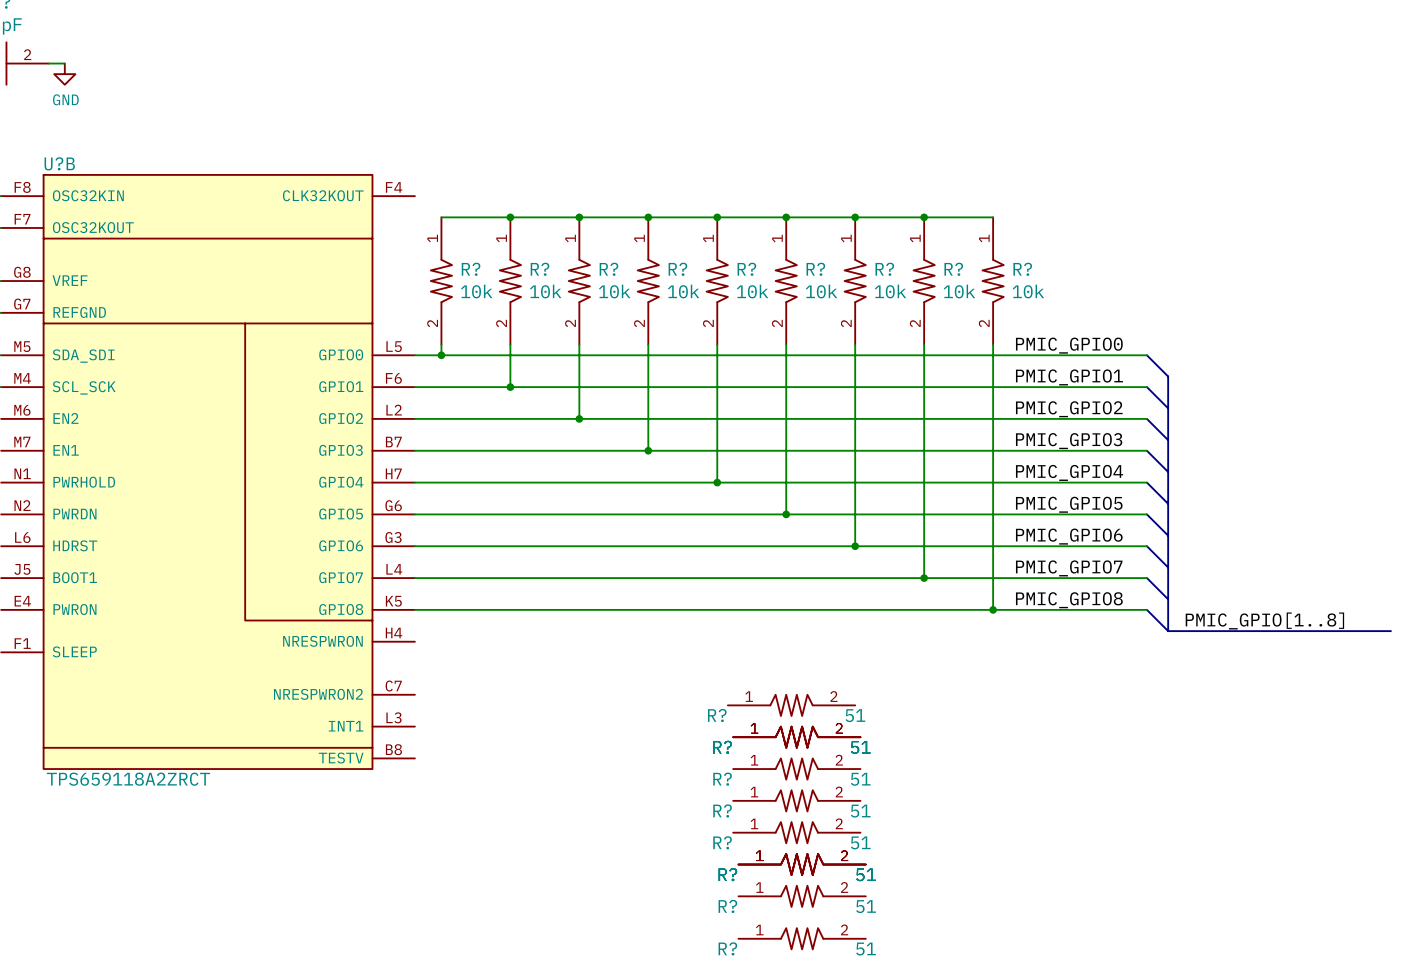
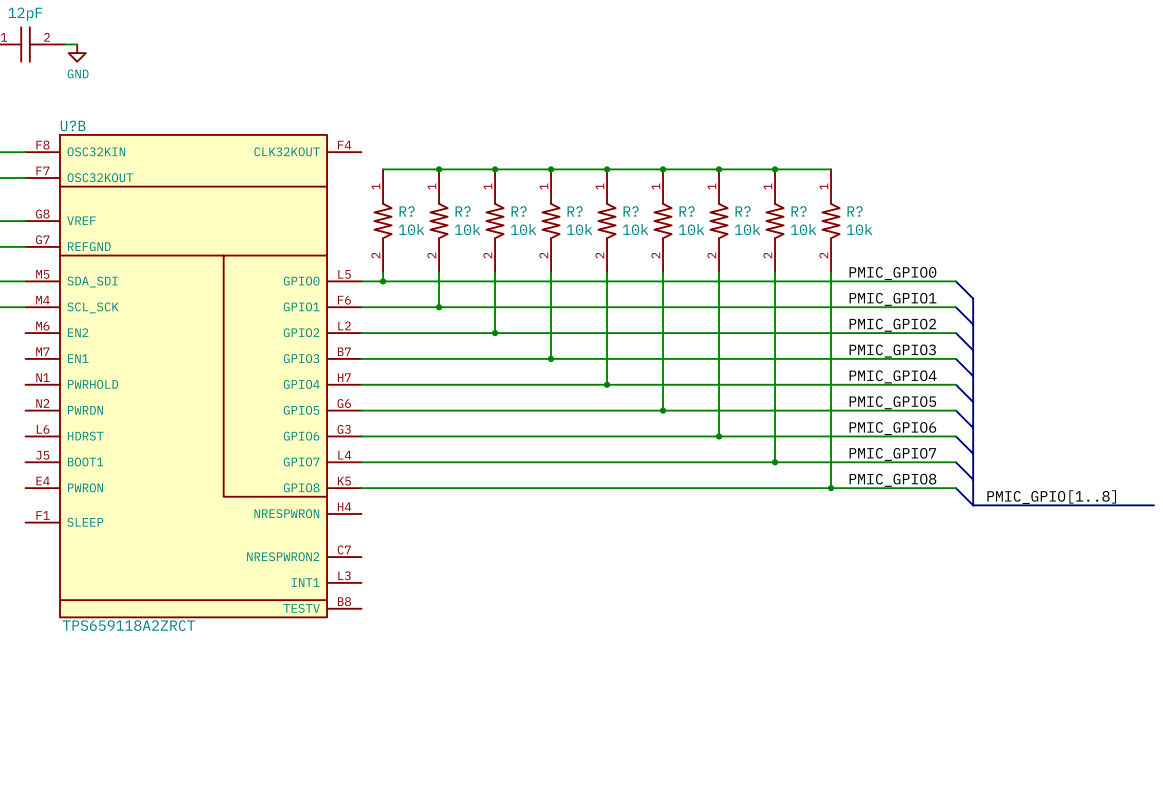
R?: (791, 705) -> none
R?: (796, 737) -> none
R?: (796, 769) -> none
R?: (796, 800) -> none
R?: (796, 832) -> none
R?: (802, 864) -> none
R?: (802, 896) -> none
R?: (802, 938) -> none

